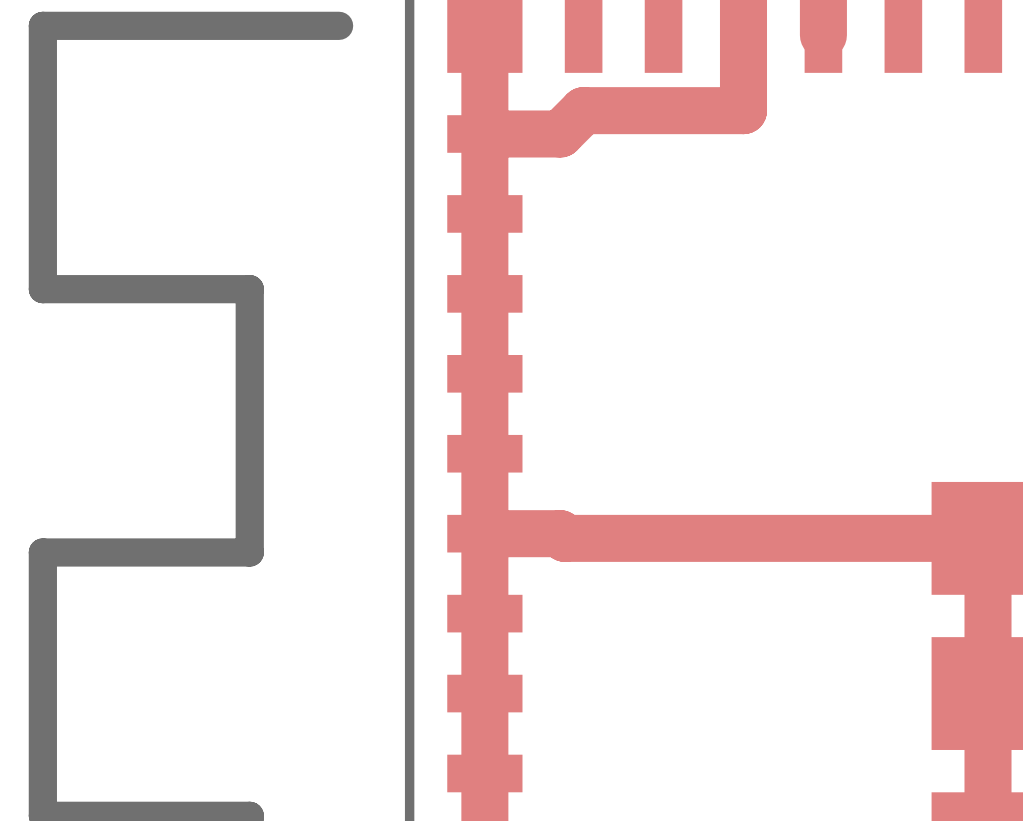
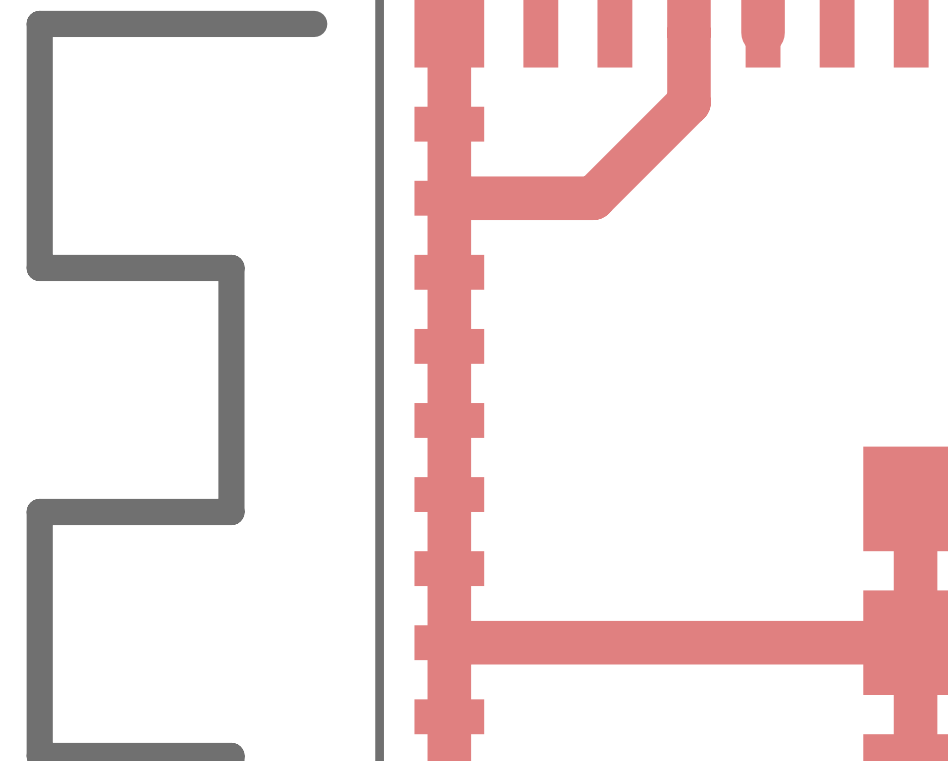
track: (743, 110) (583, 110) (560, 133) (484, 133) -> (688, 102) (593, 198) (449, 198)
track: (484, 533) (560, 533) (564, 538) (988, 538) -> none
track: none -> (449, 642) (915, 642)

